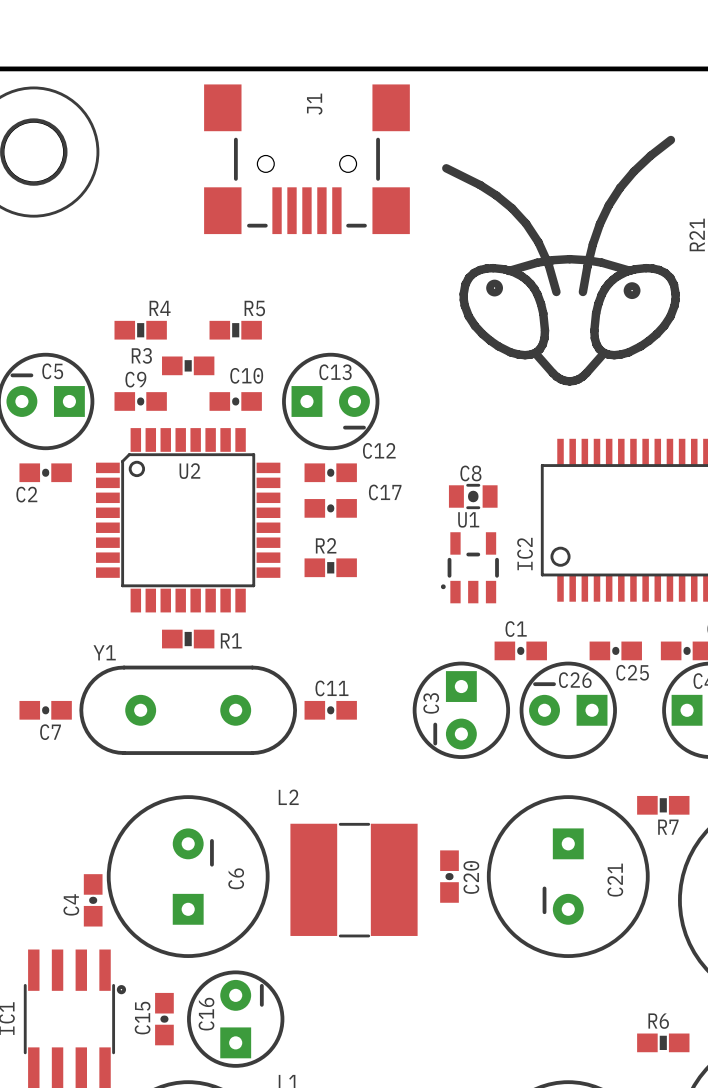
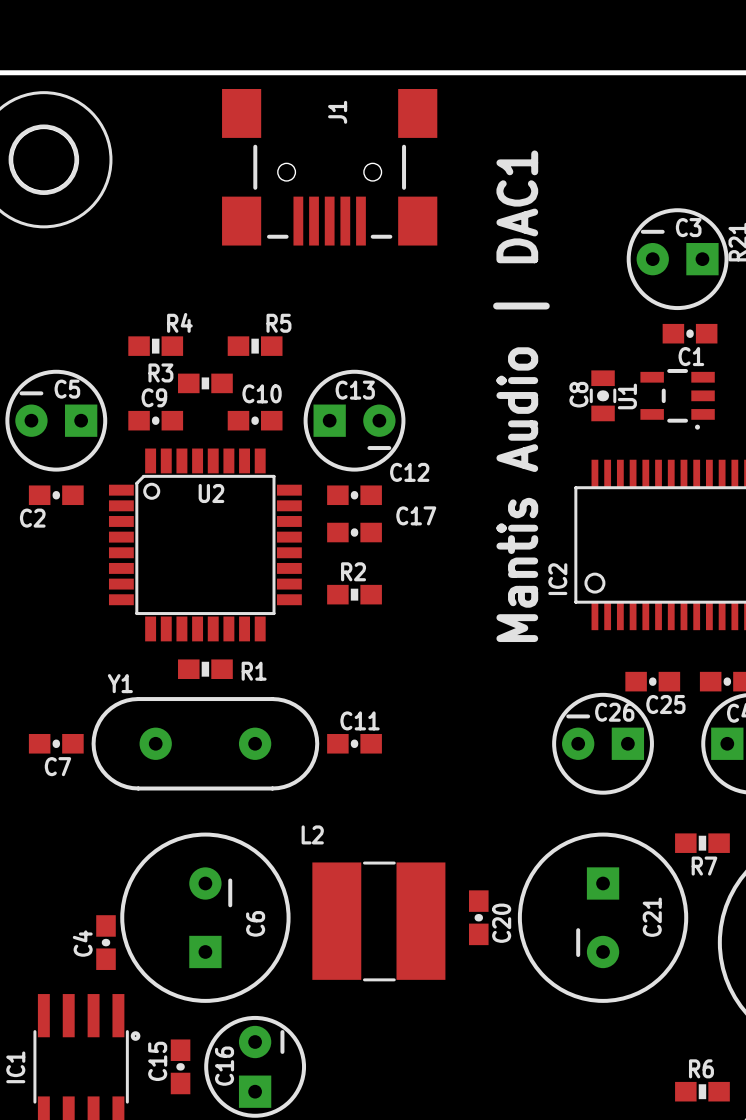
drawing: [442, 135, 680, 386] -> none
text: none -> Mantis Audio | DAC1 (521, 396)
C8 rotation: 0° (473, 496) -> 90° clockwise (603, 395)
C8 position: (473, 496) -> (603, 395)
U1 rotation: 0° (469, 567) -> 90° counterclockwise (677, 399)
U1 position: (469, 567) -> (677, 399)
C1 name position: C1 (516, 629) -> C1 (691, 356)
C1 position: (520, 650) -> (690, 333)
C3 rotation: 0° (461, 710) -> 90° clockwise (677, 259)
C3 position: (461, 710) -> (677, 259)

